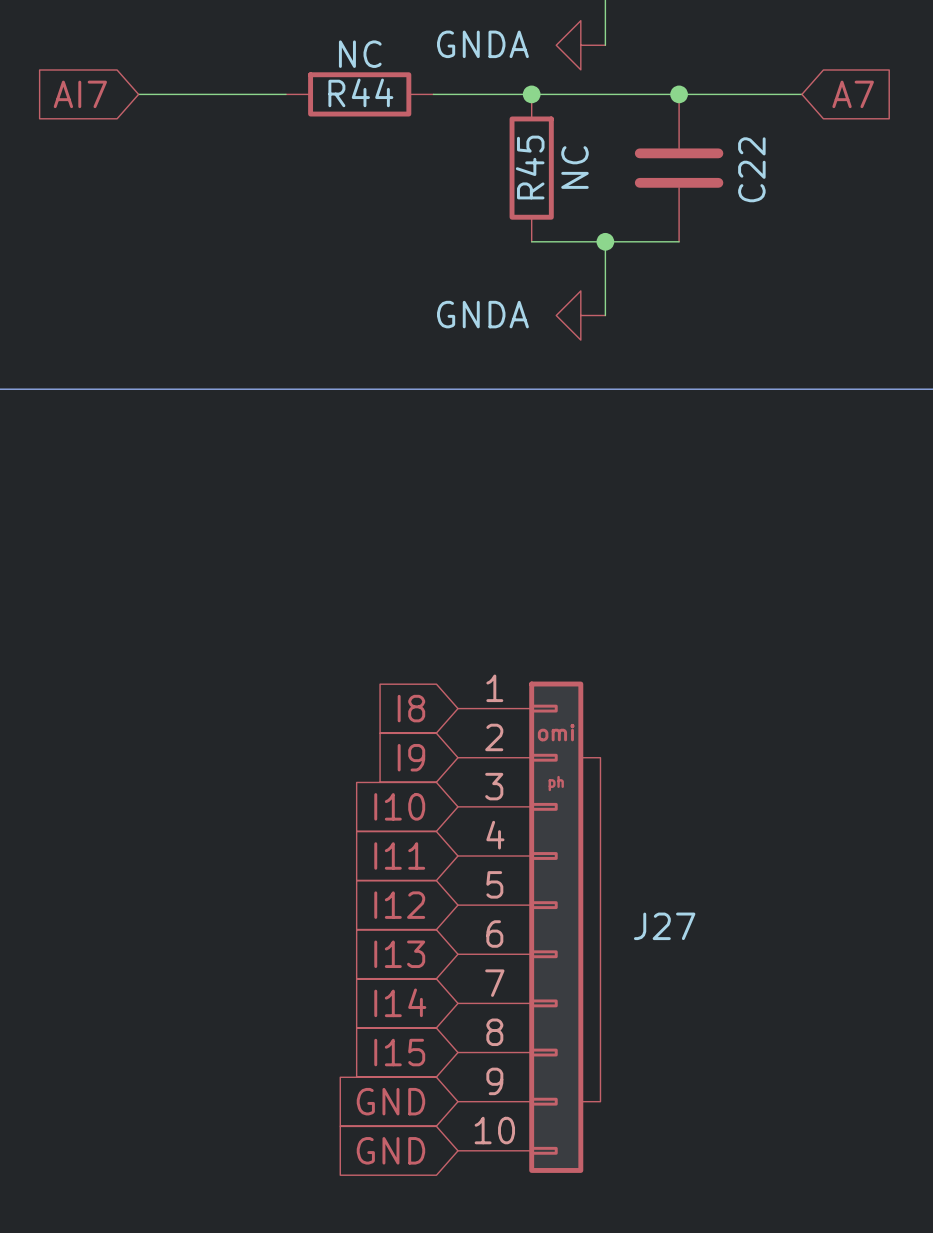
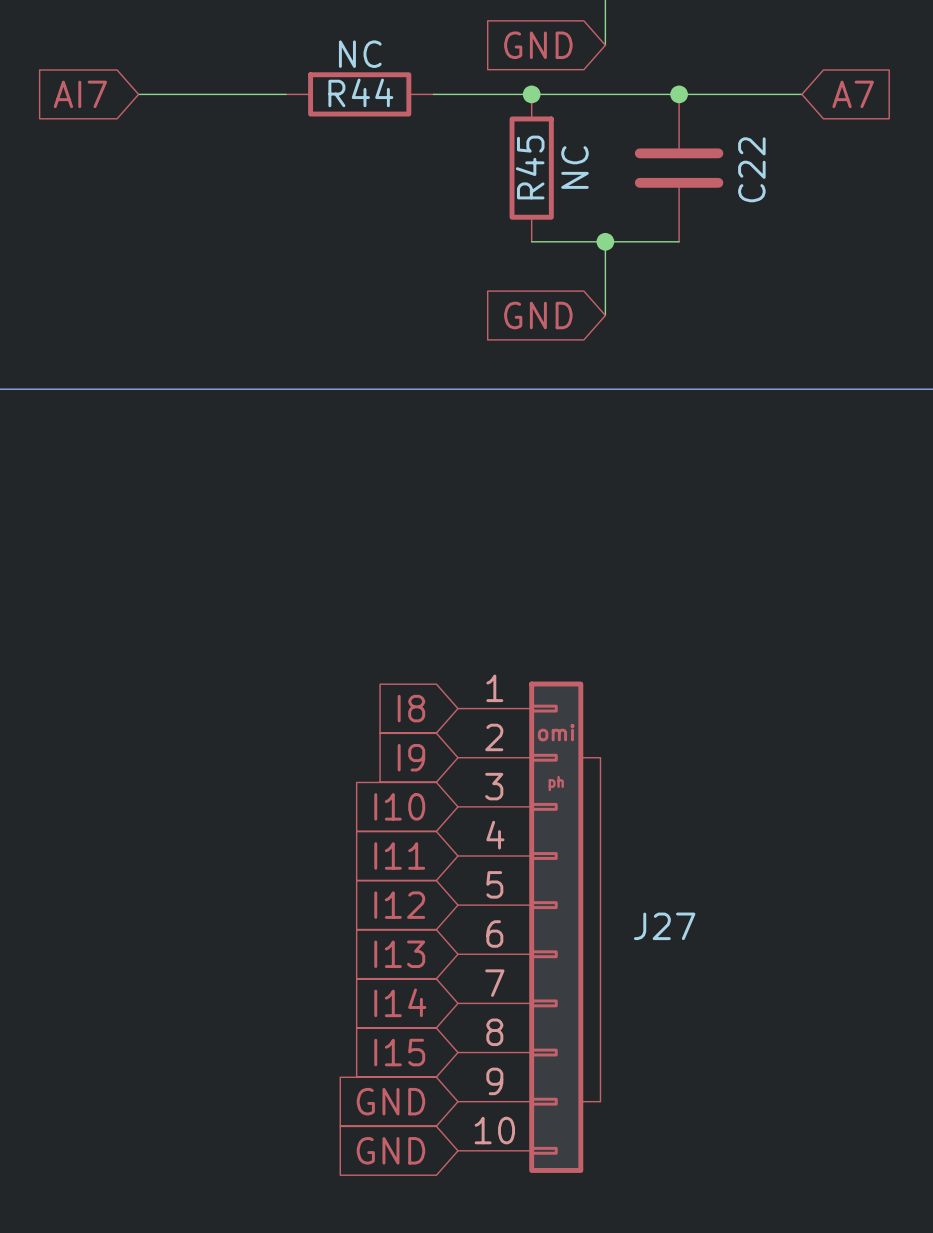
global label: none -> GND (538, 45)
power symbol: GNDA (580, 45) -> none
global label: none -> GND (538, 315)
power symbol: GNDA (580, 315) -> none

